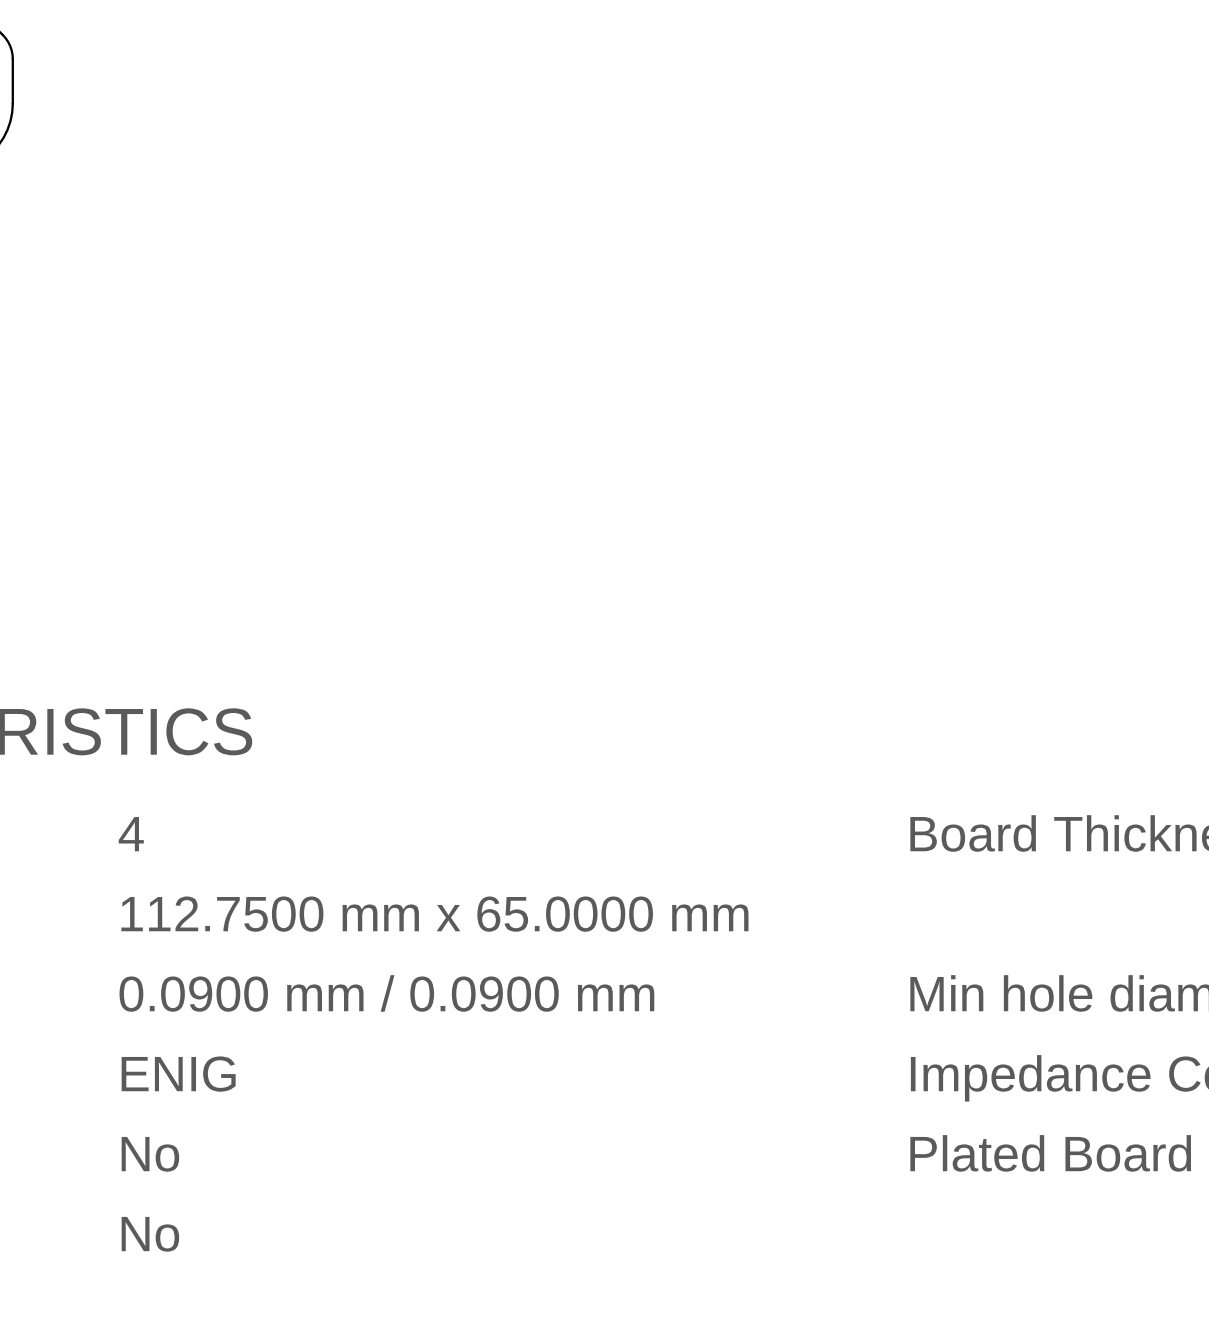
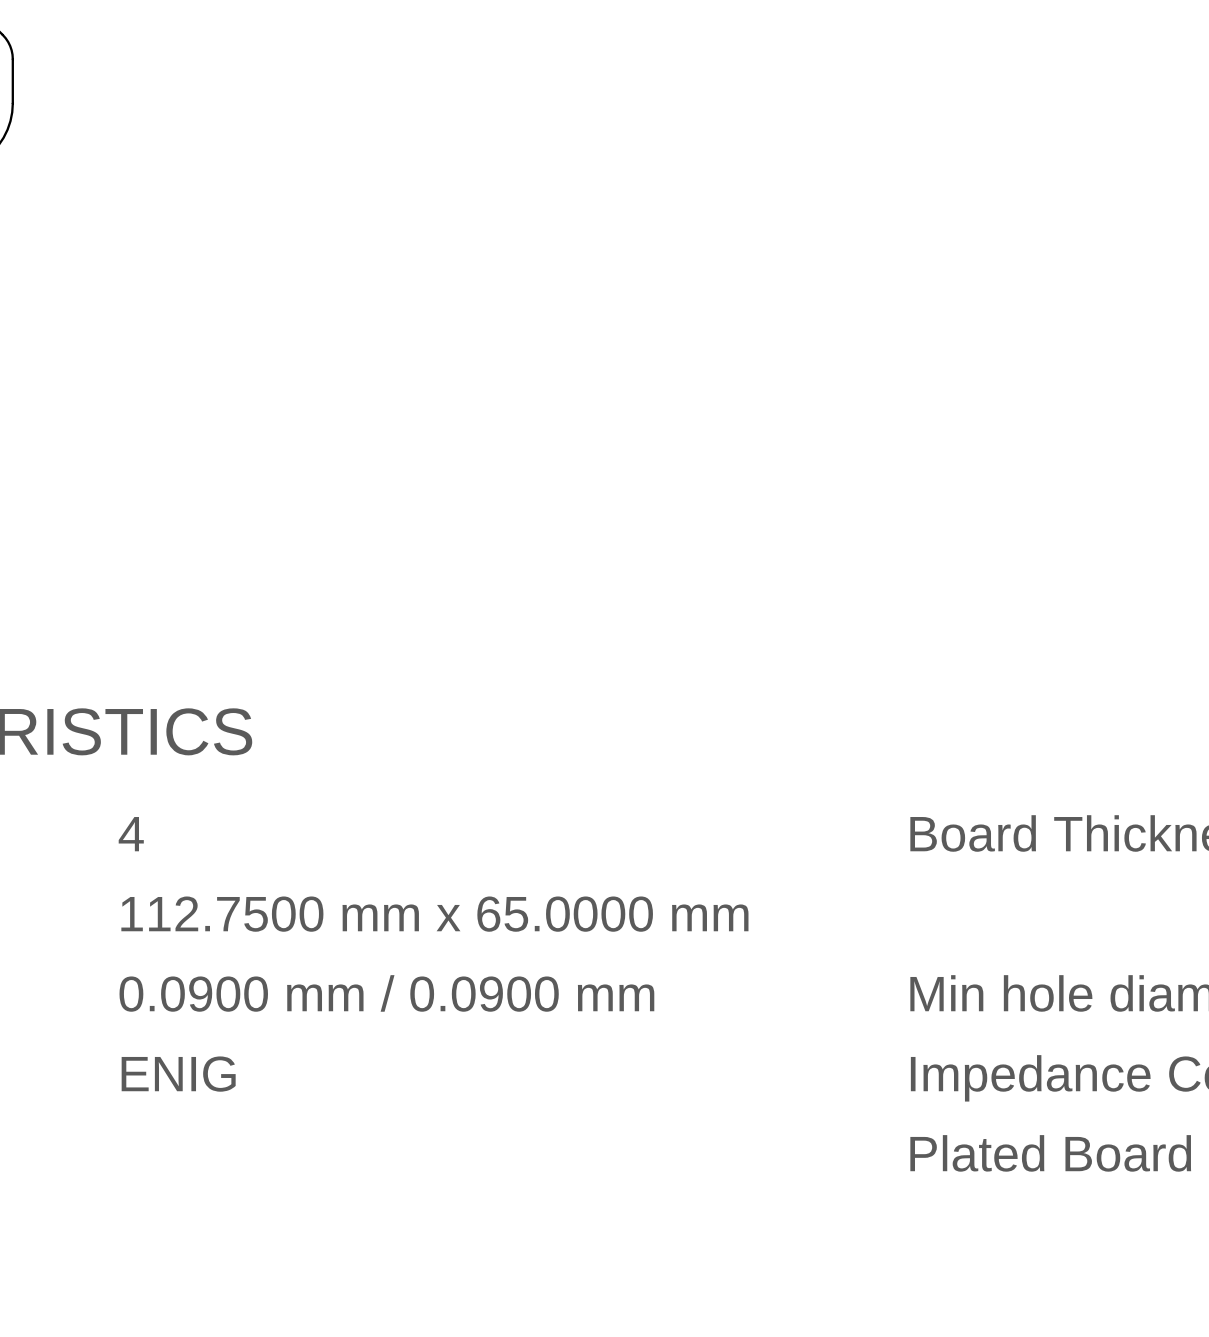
text: No (150, 1154) -> none
text: No (150, 1234) -> none

